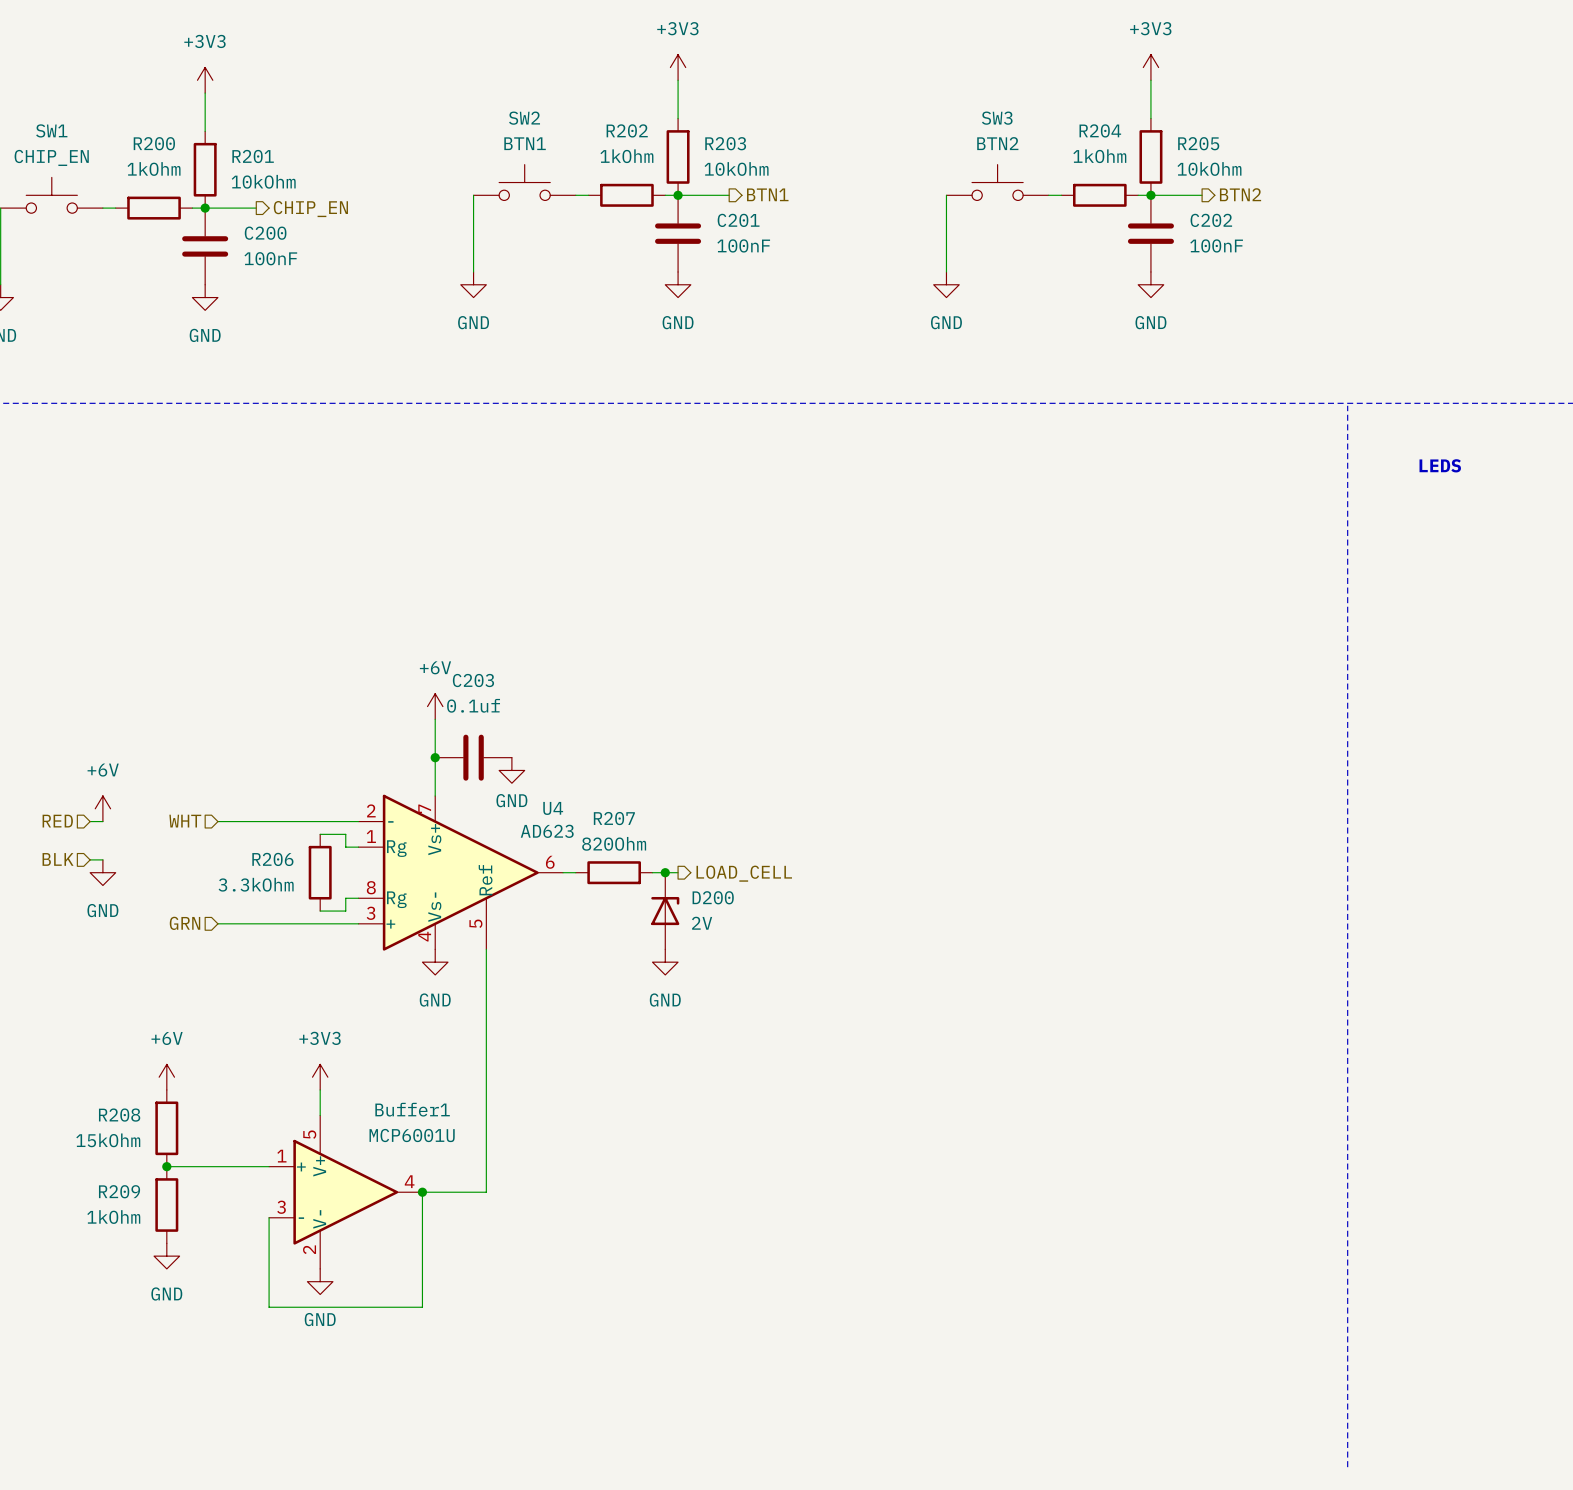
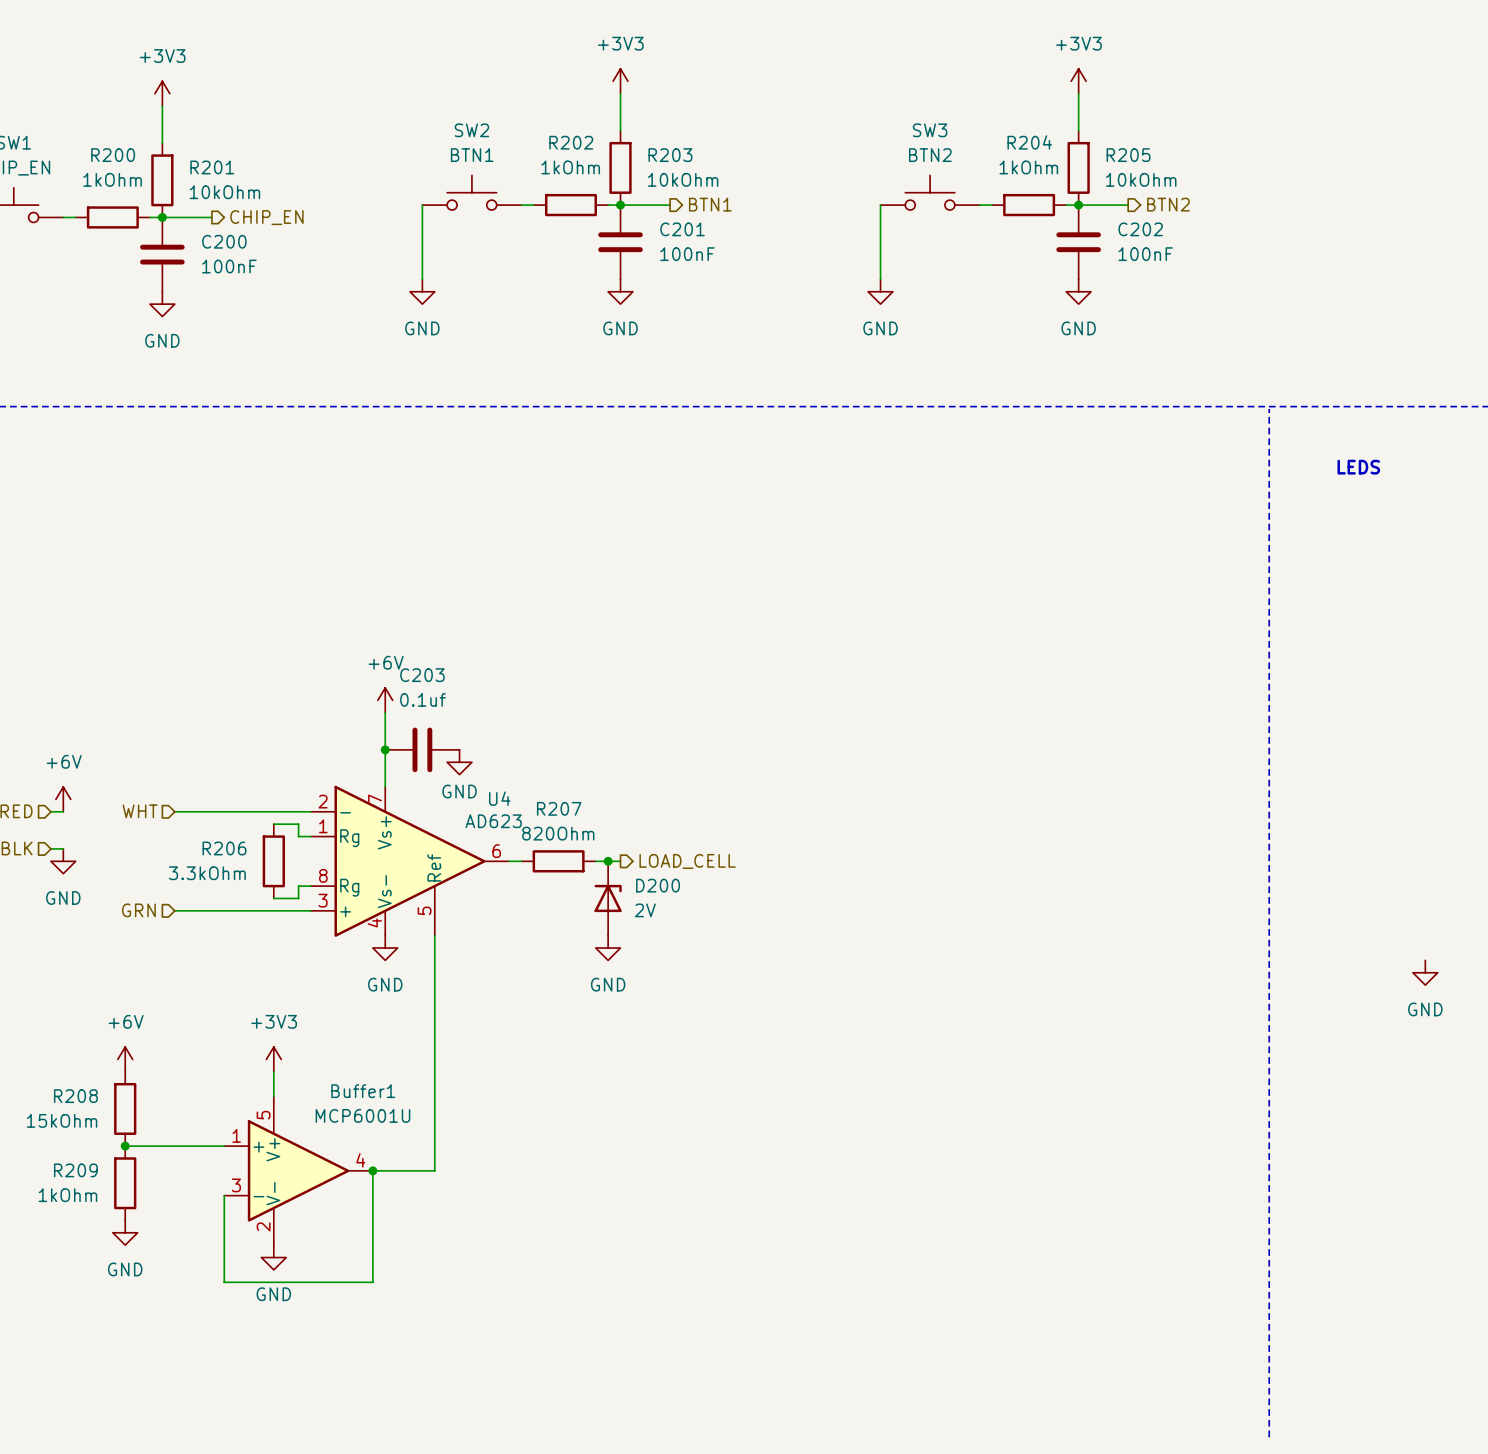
power symbol: none -> GND (1425, 972)

